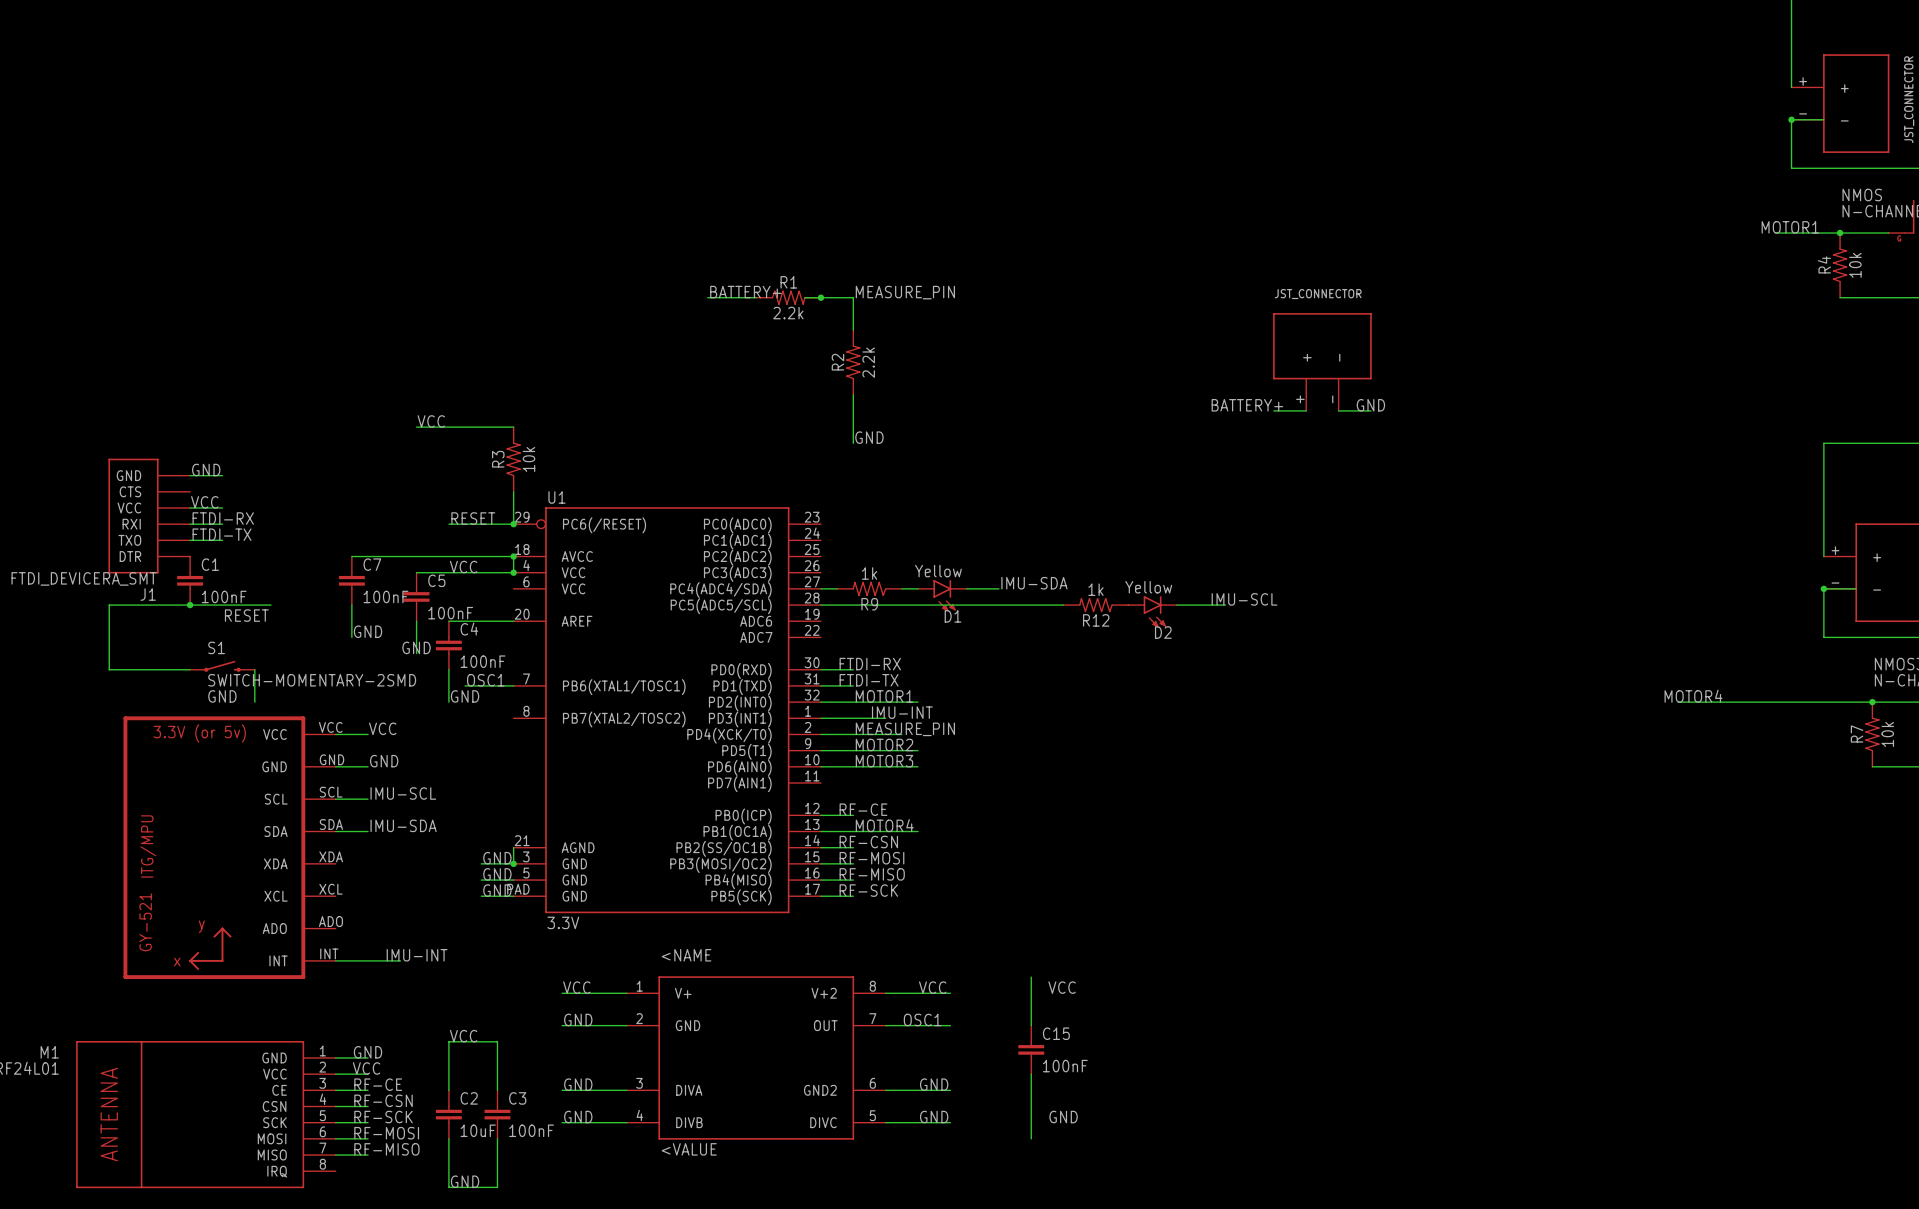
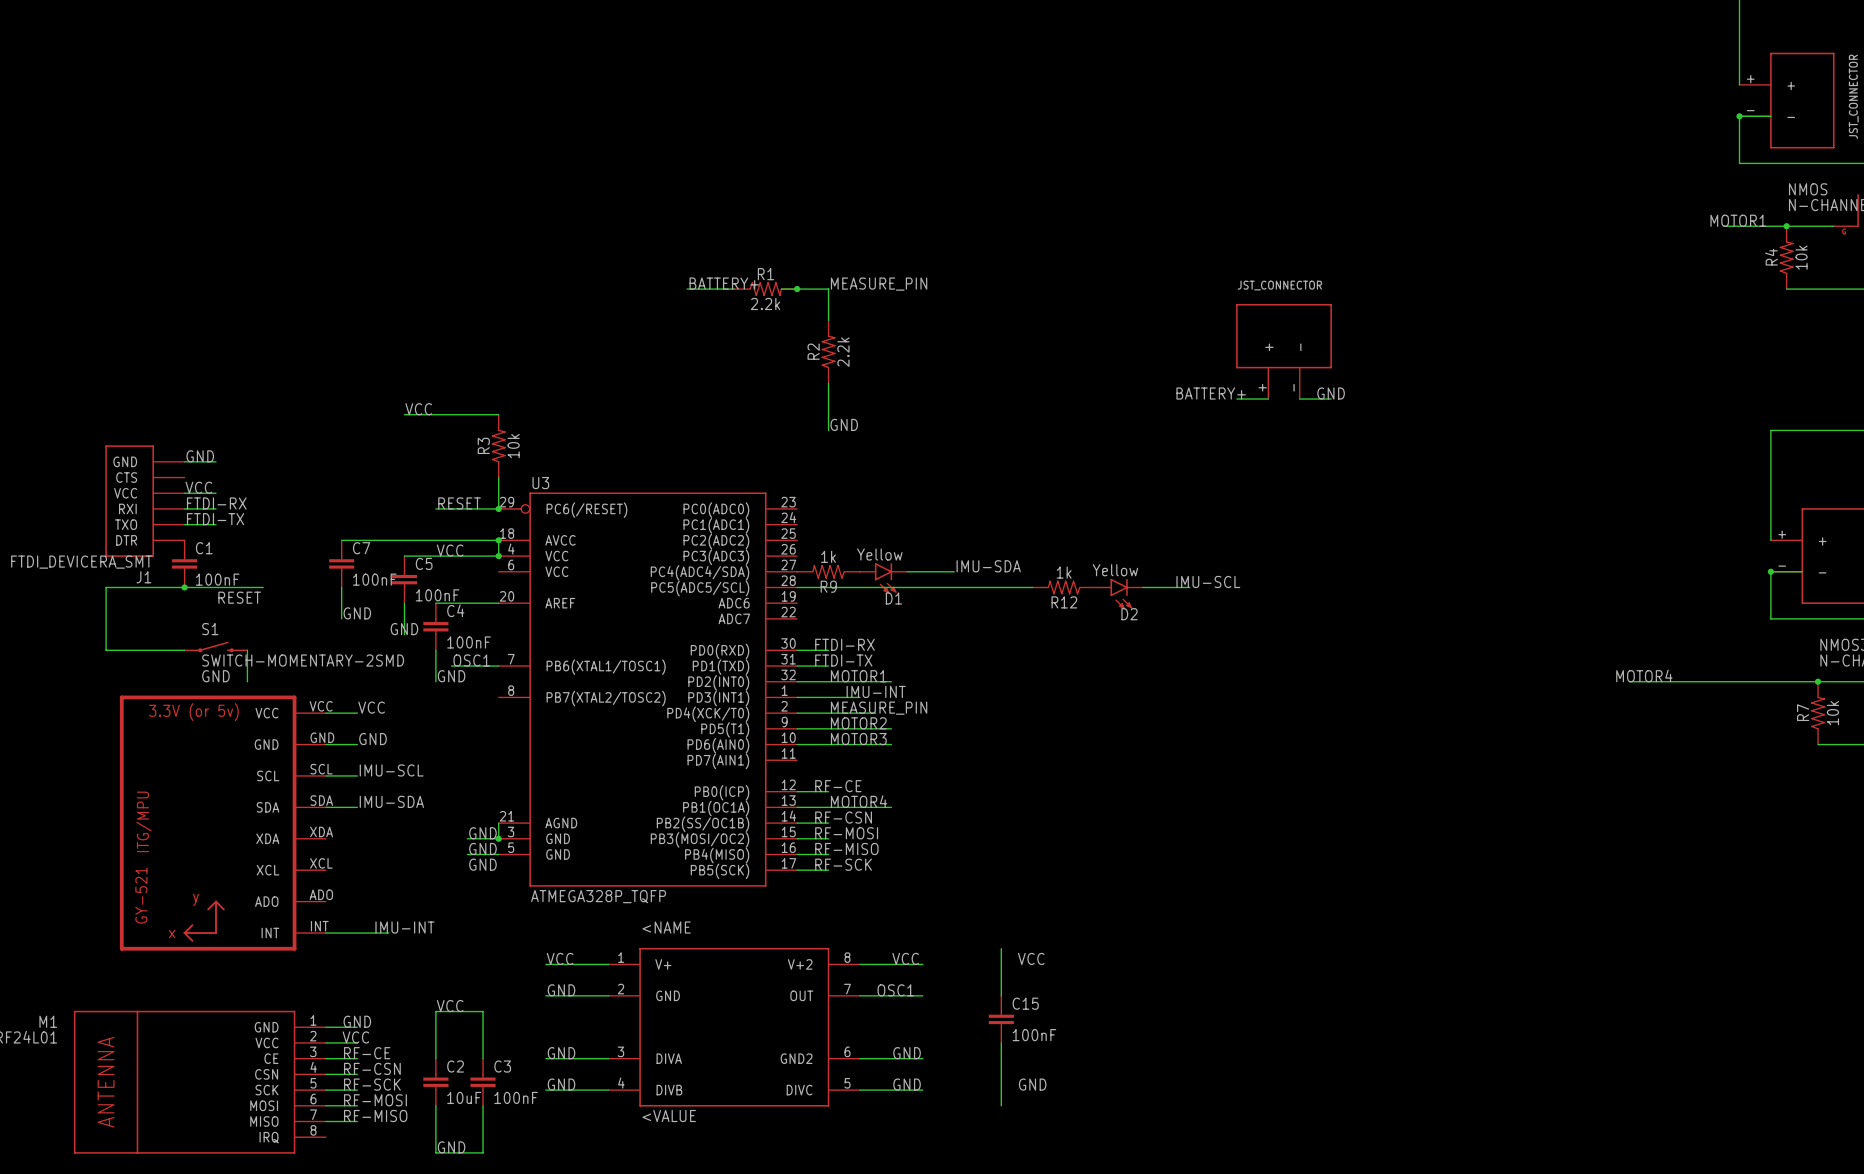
label position: IMU-SDA (1034, 583) -> IMU-SDA (988, 566)
R9 position: (869, 588) -> (828, 571)
wire: (901, 588) (918, 588) -> none
wire: (982, 588) (998, 588) -> none
D1 position: (942, 595) -> (883, 578)
U1: 3.3V (667, 710) -> none
U3: none -> ATMEGA328P_TQFP (647, 689)
wire: (481, 896) (513, 896) -> none

